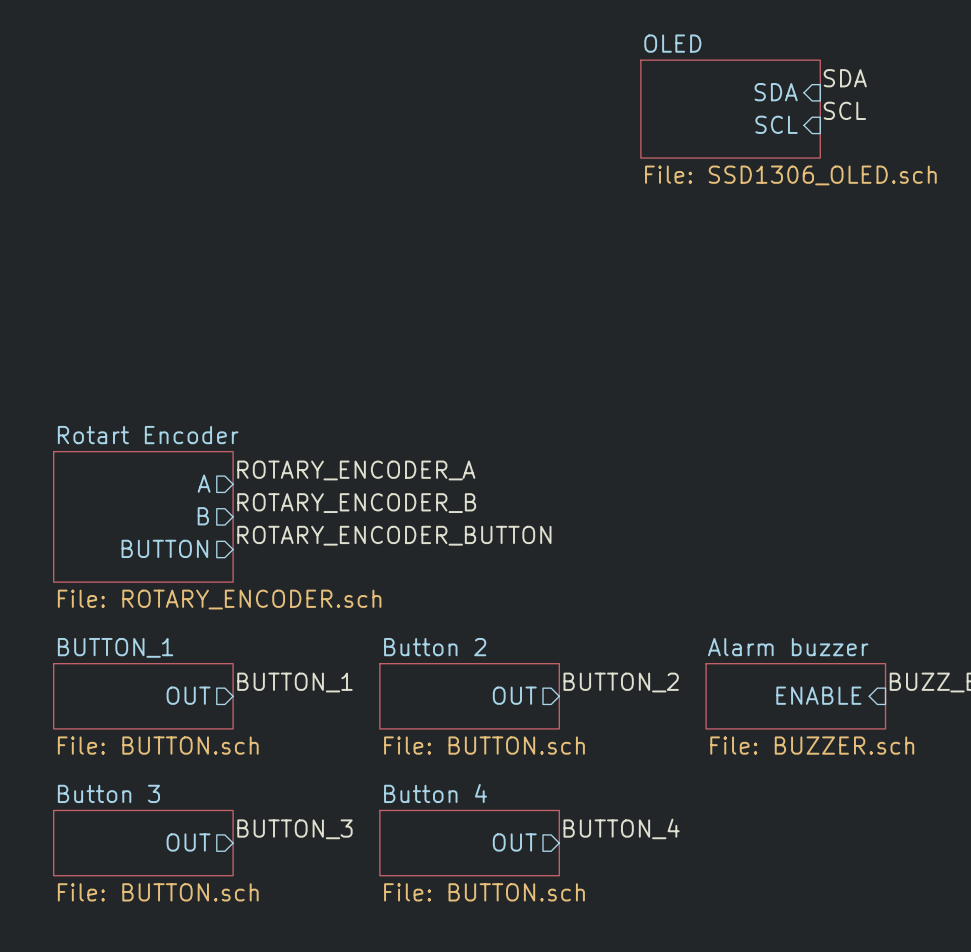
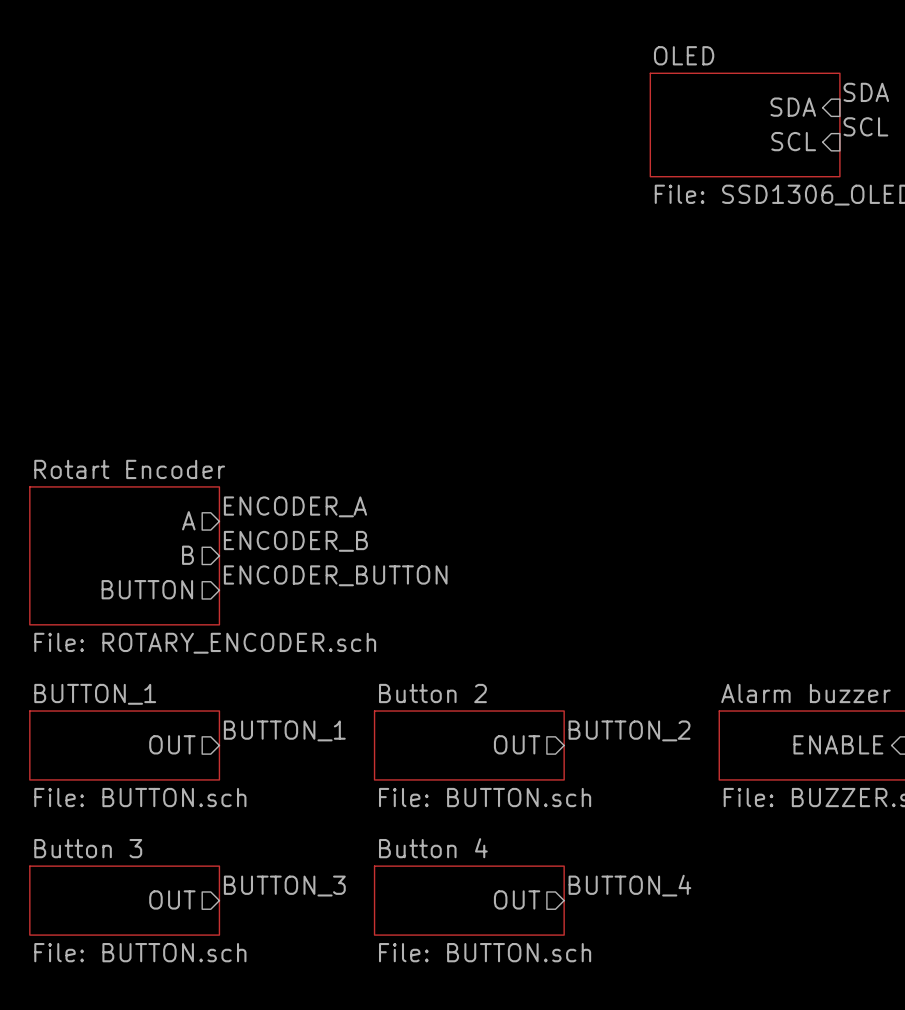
label: ROTARY_ENCODER_A (356, 470) -> ENCODER_A (295, 506)
label: ROTARY_ENCODER_B (356, 503) -> ENCODER_B (295, 541)
label: ROTARY_ENCODER_BUTTON (394, 535) -> ENCODER_BUTTON (335, 575)

